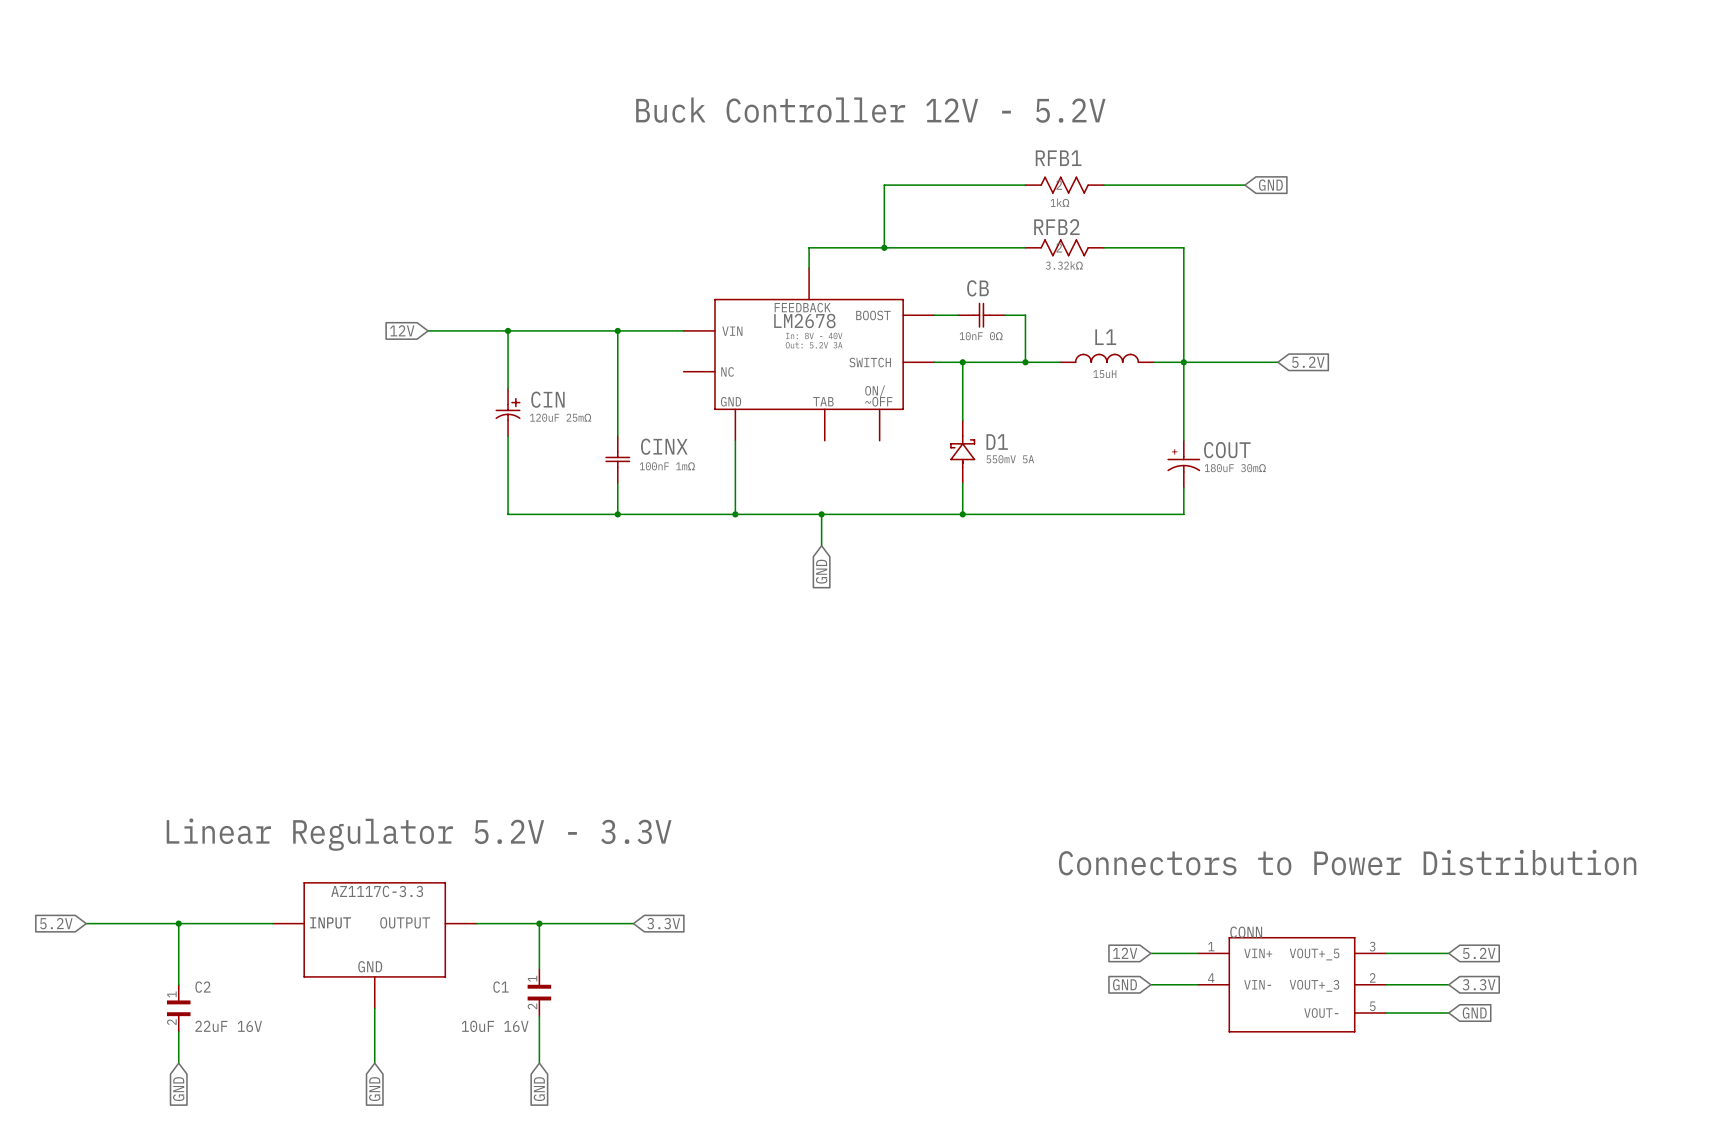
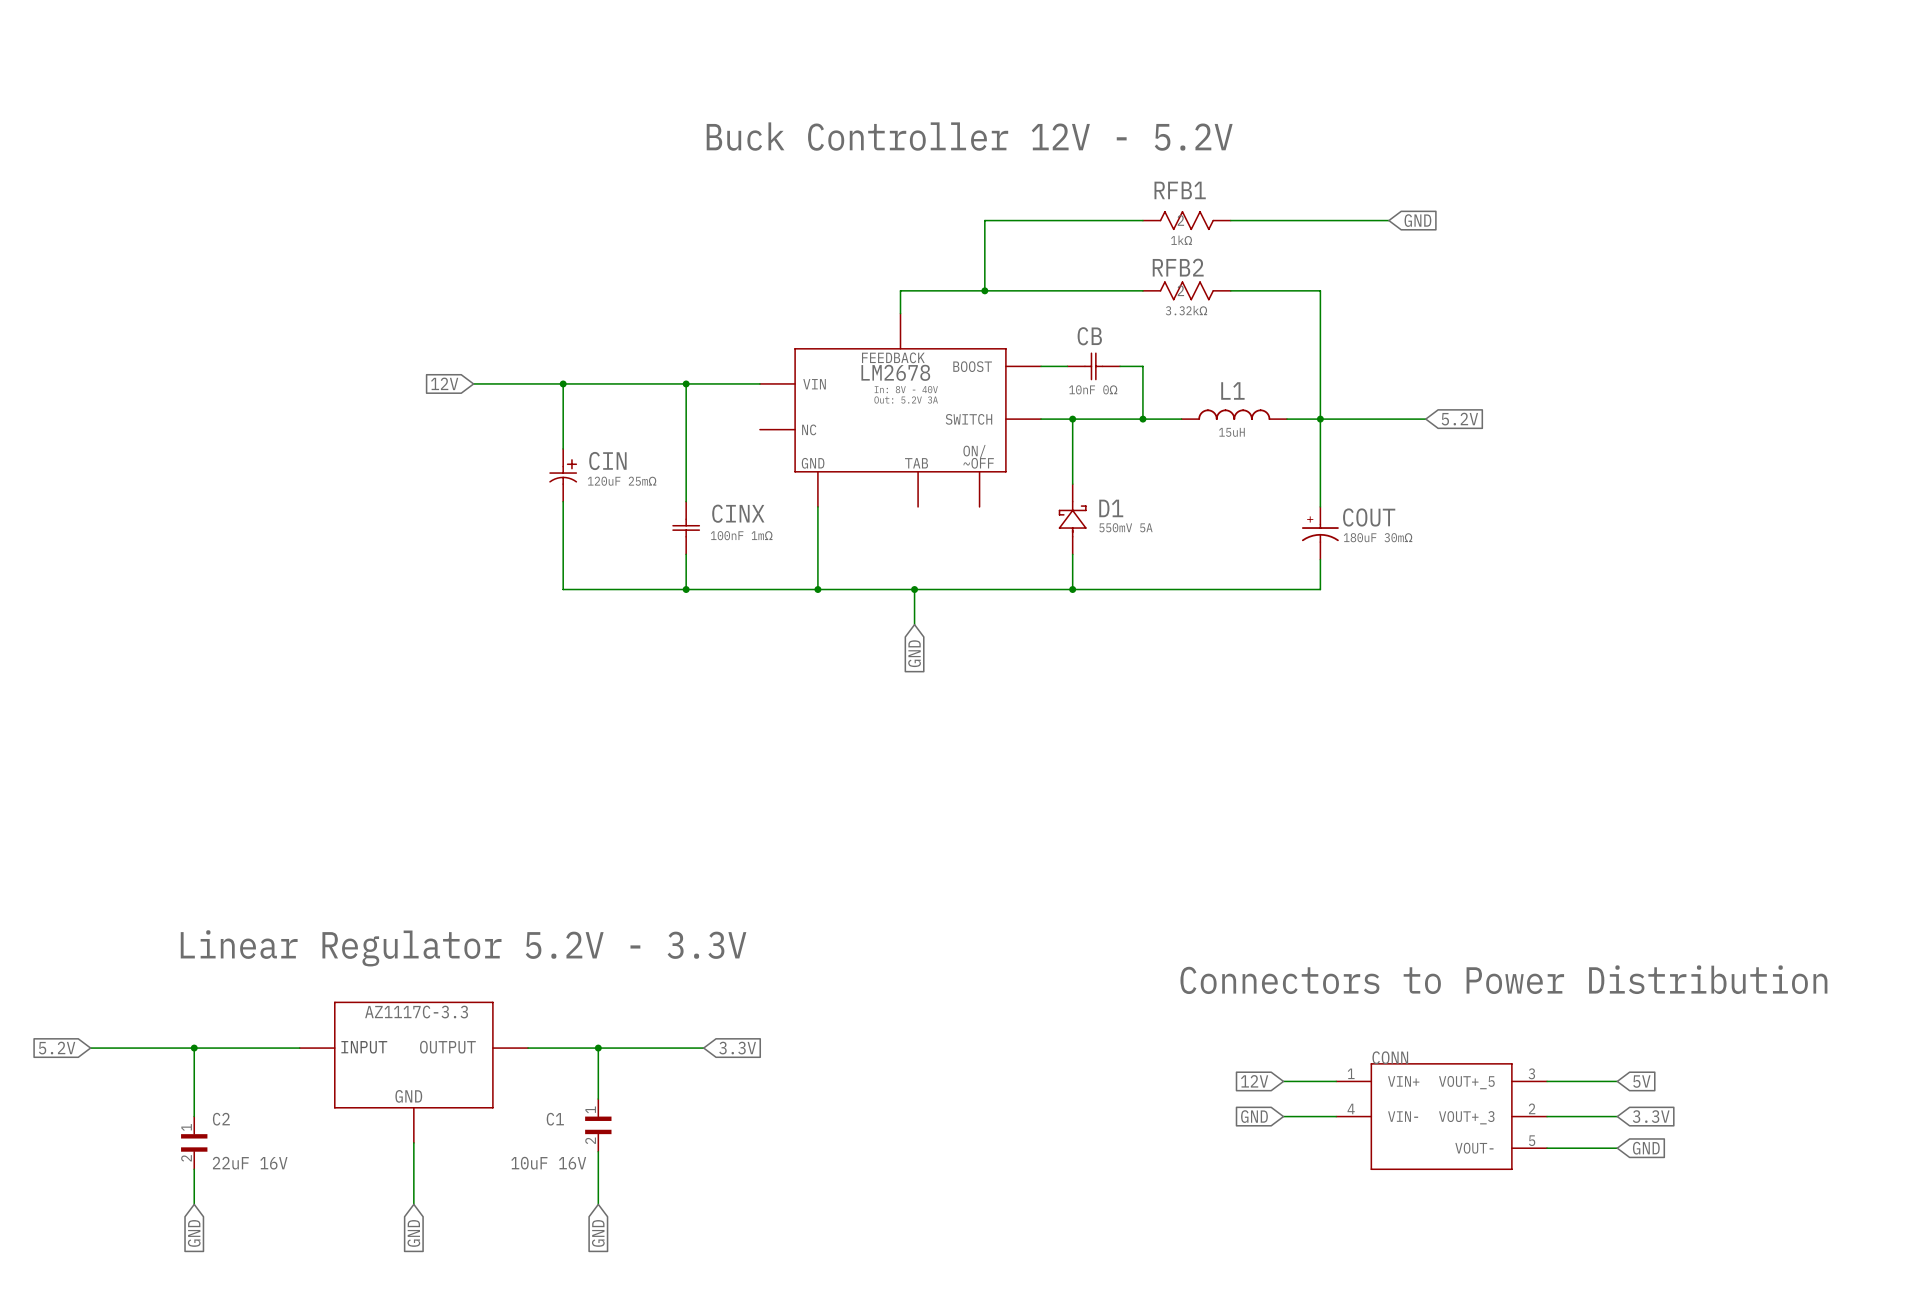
global label: 5.2V (1479, 953) -> 5V (1641, 1081)

